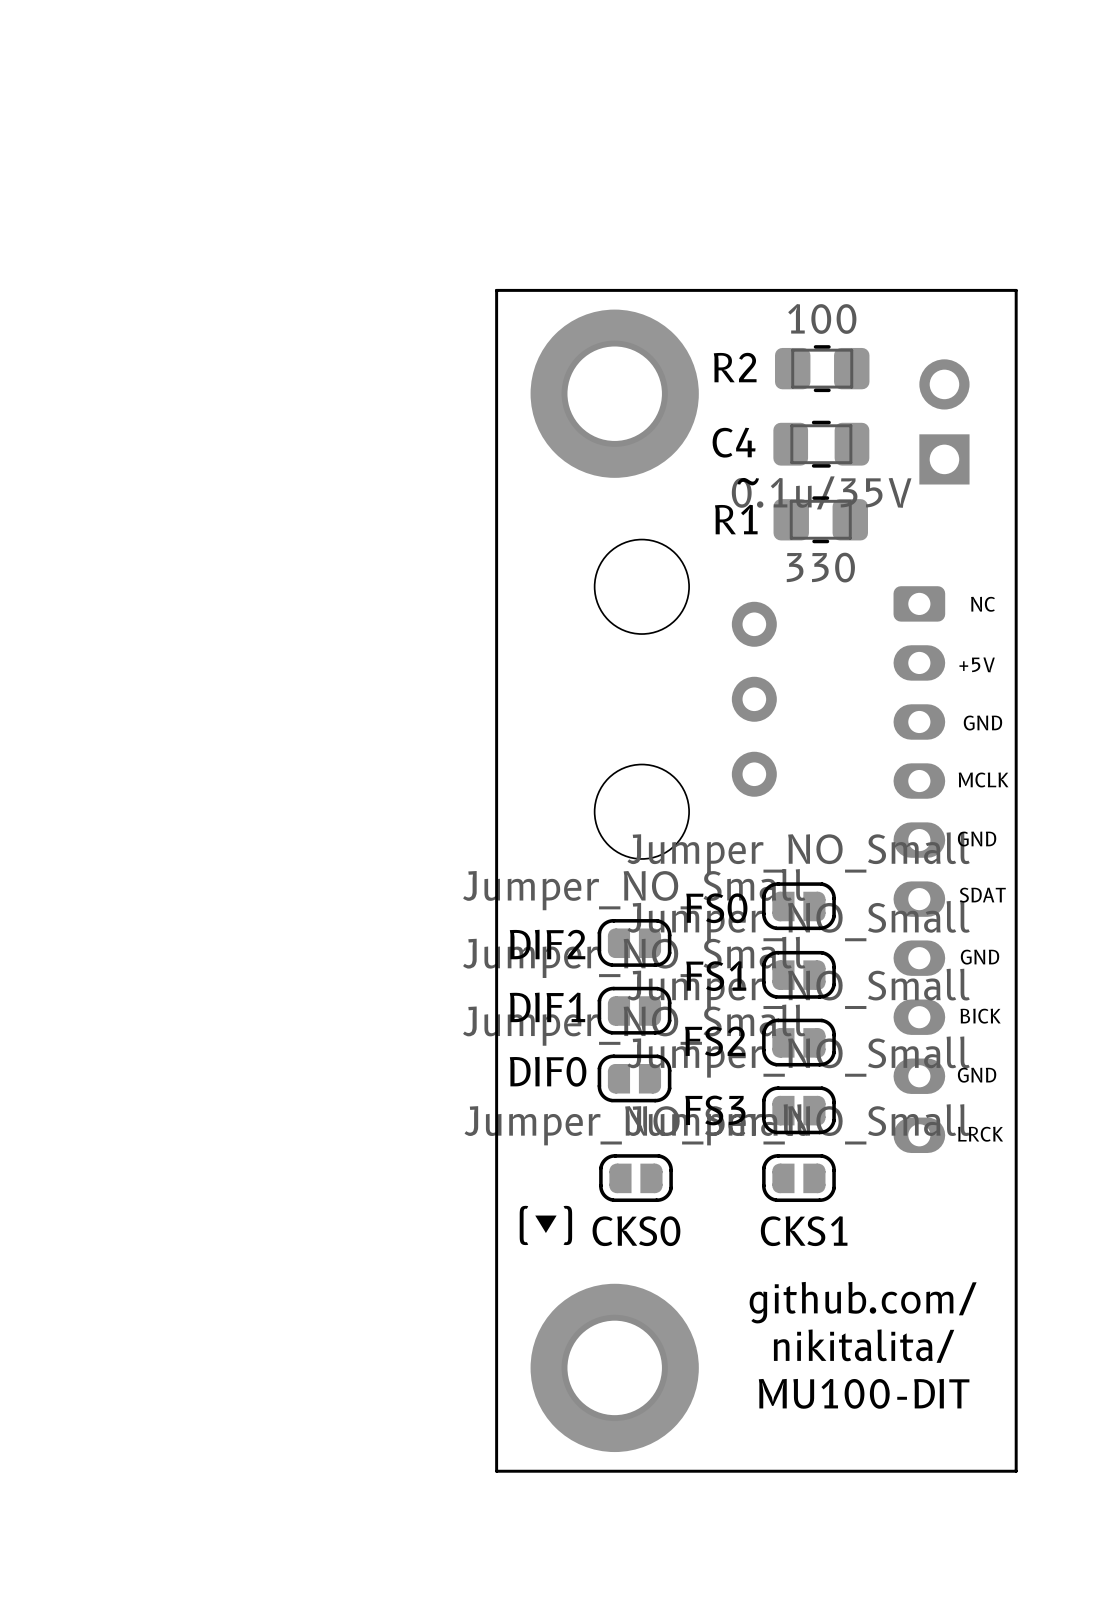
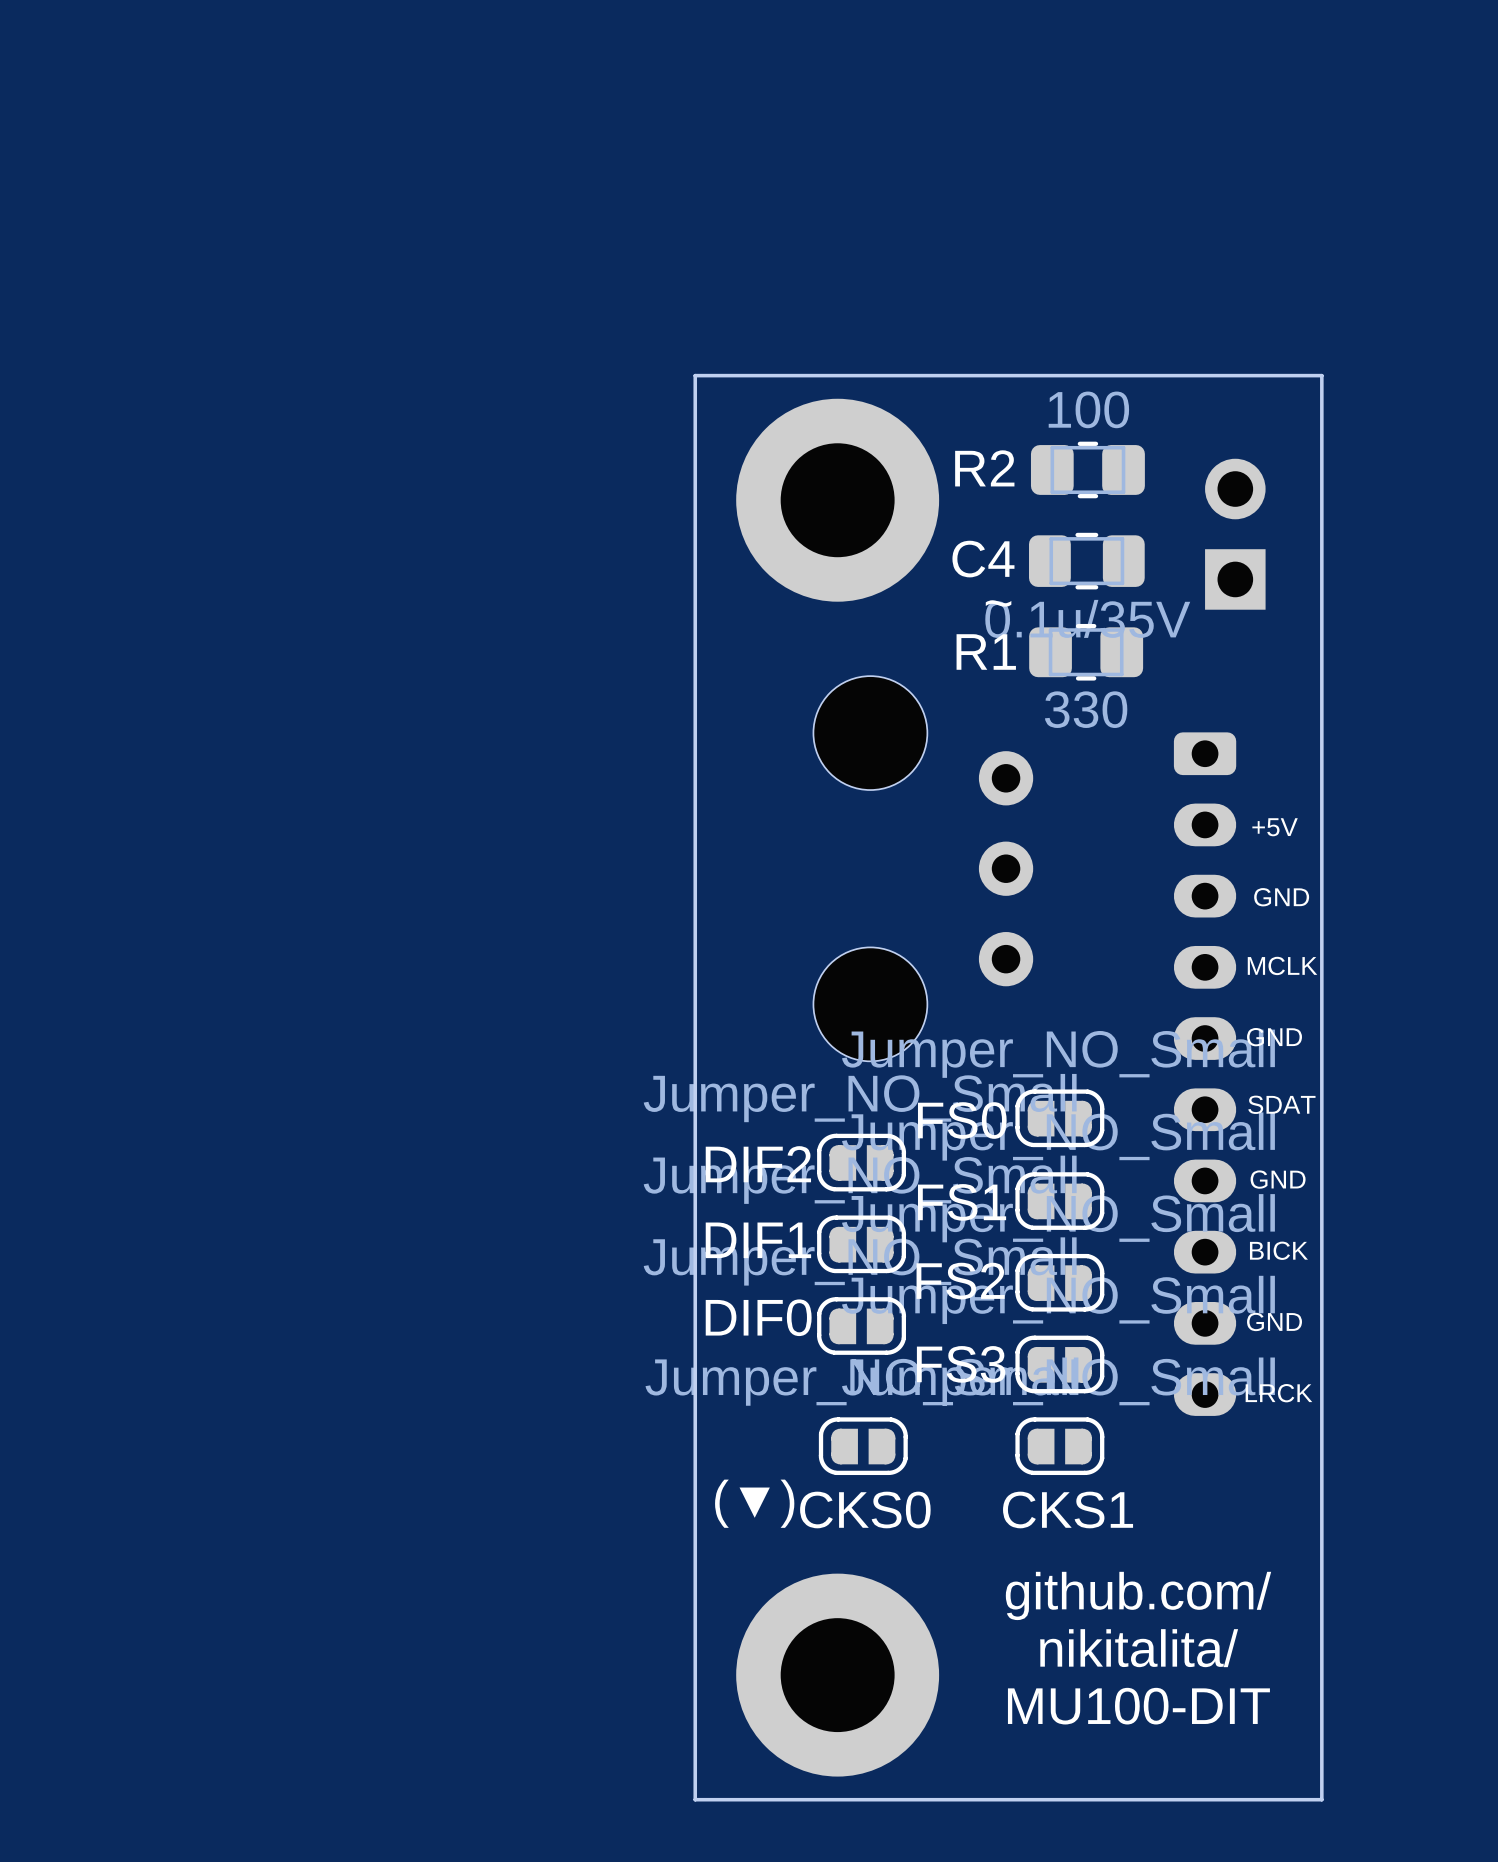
text: NC (982, 604) -> none

